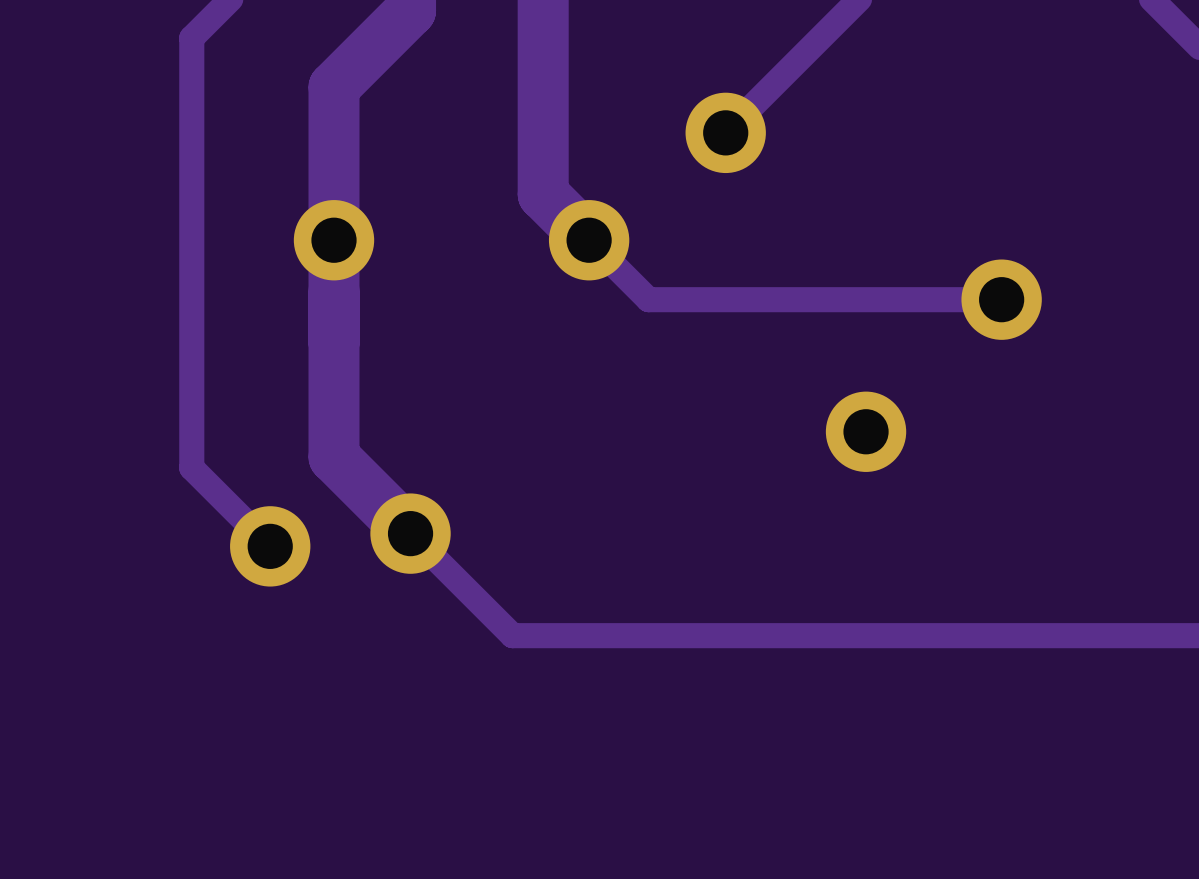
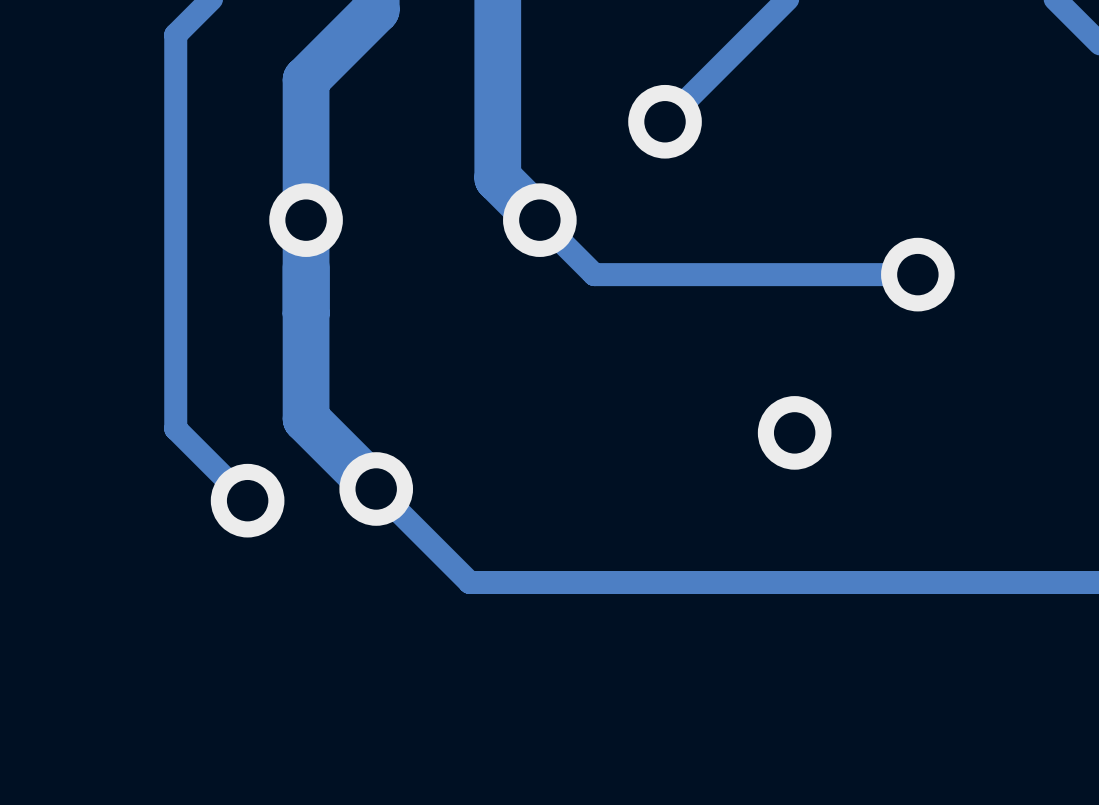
via position: (866, 431) -> (794, 432)

